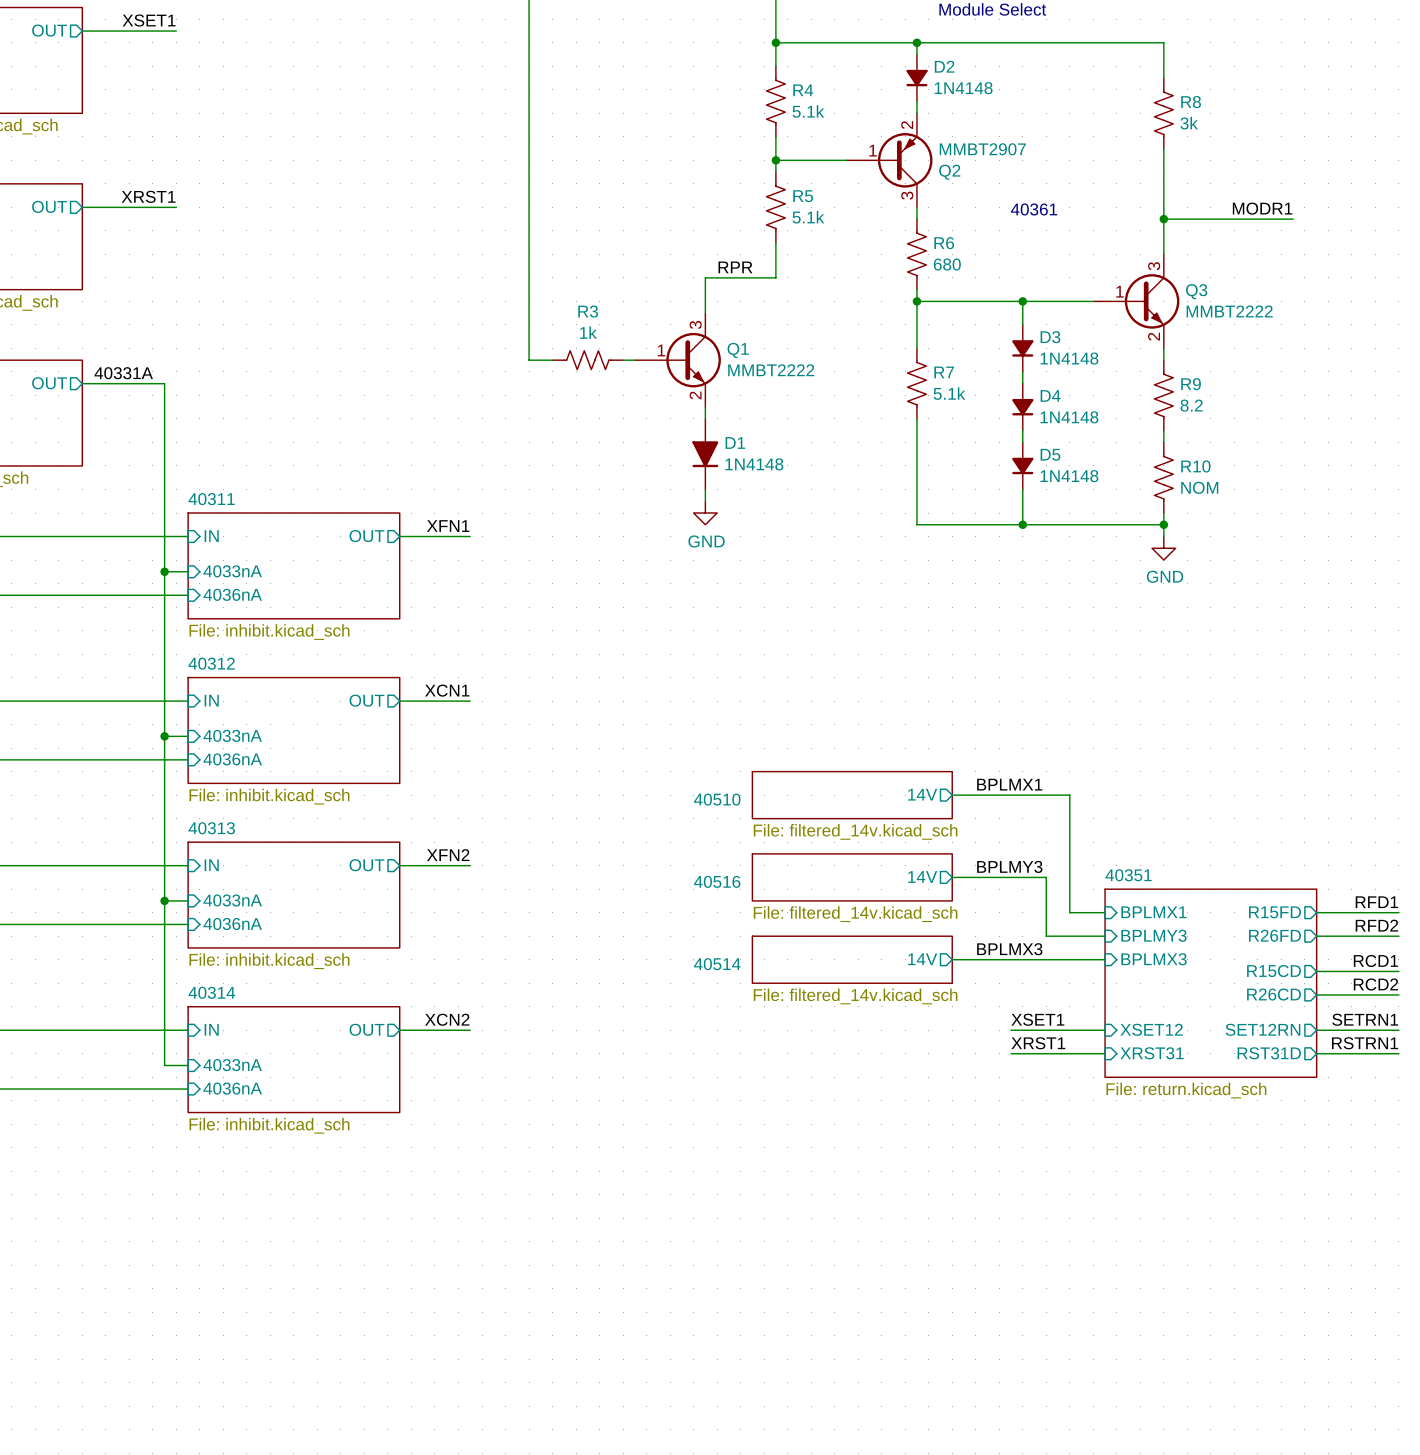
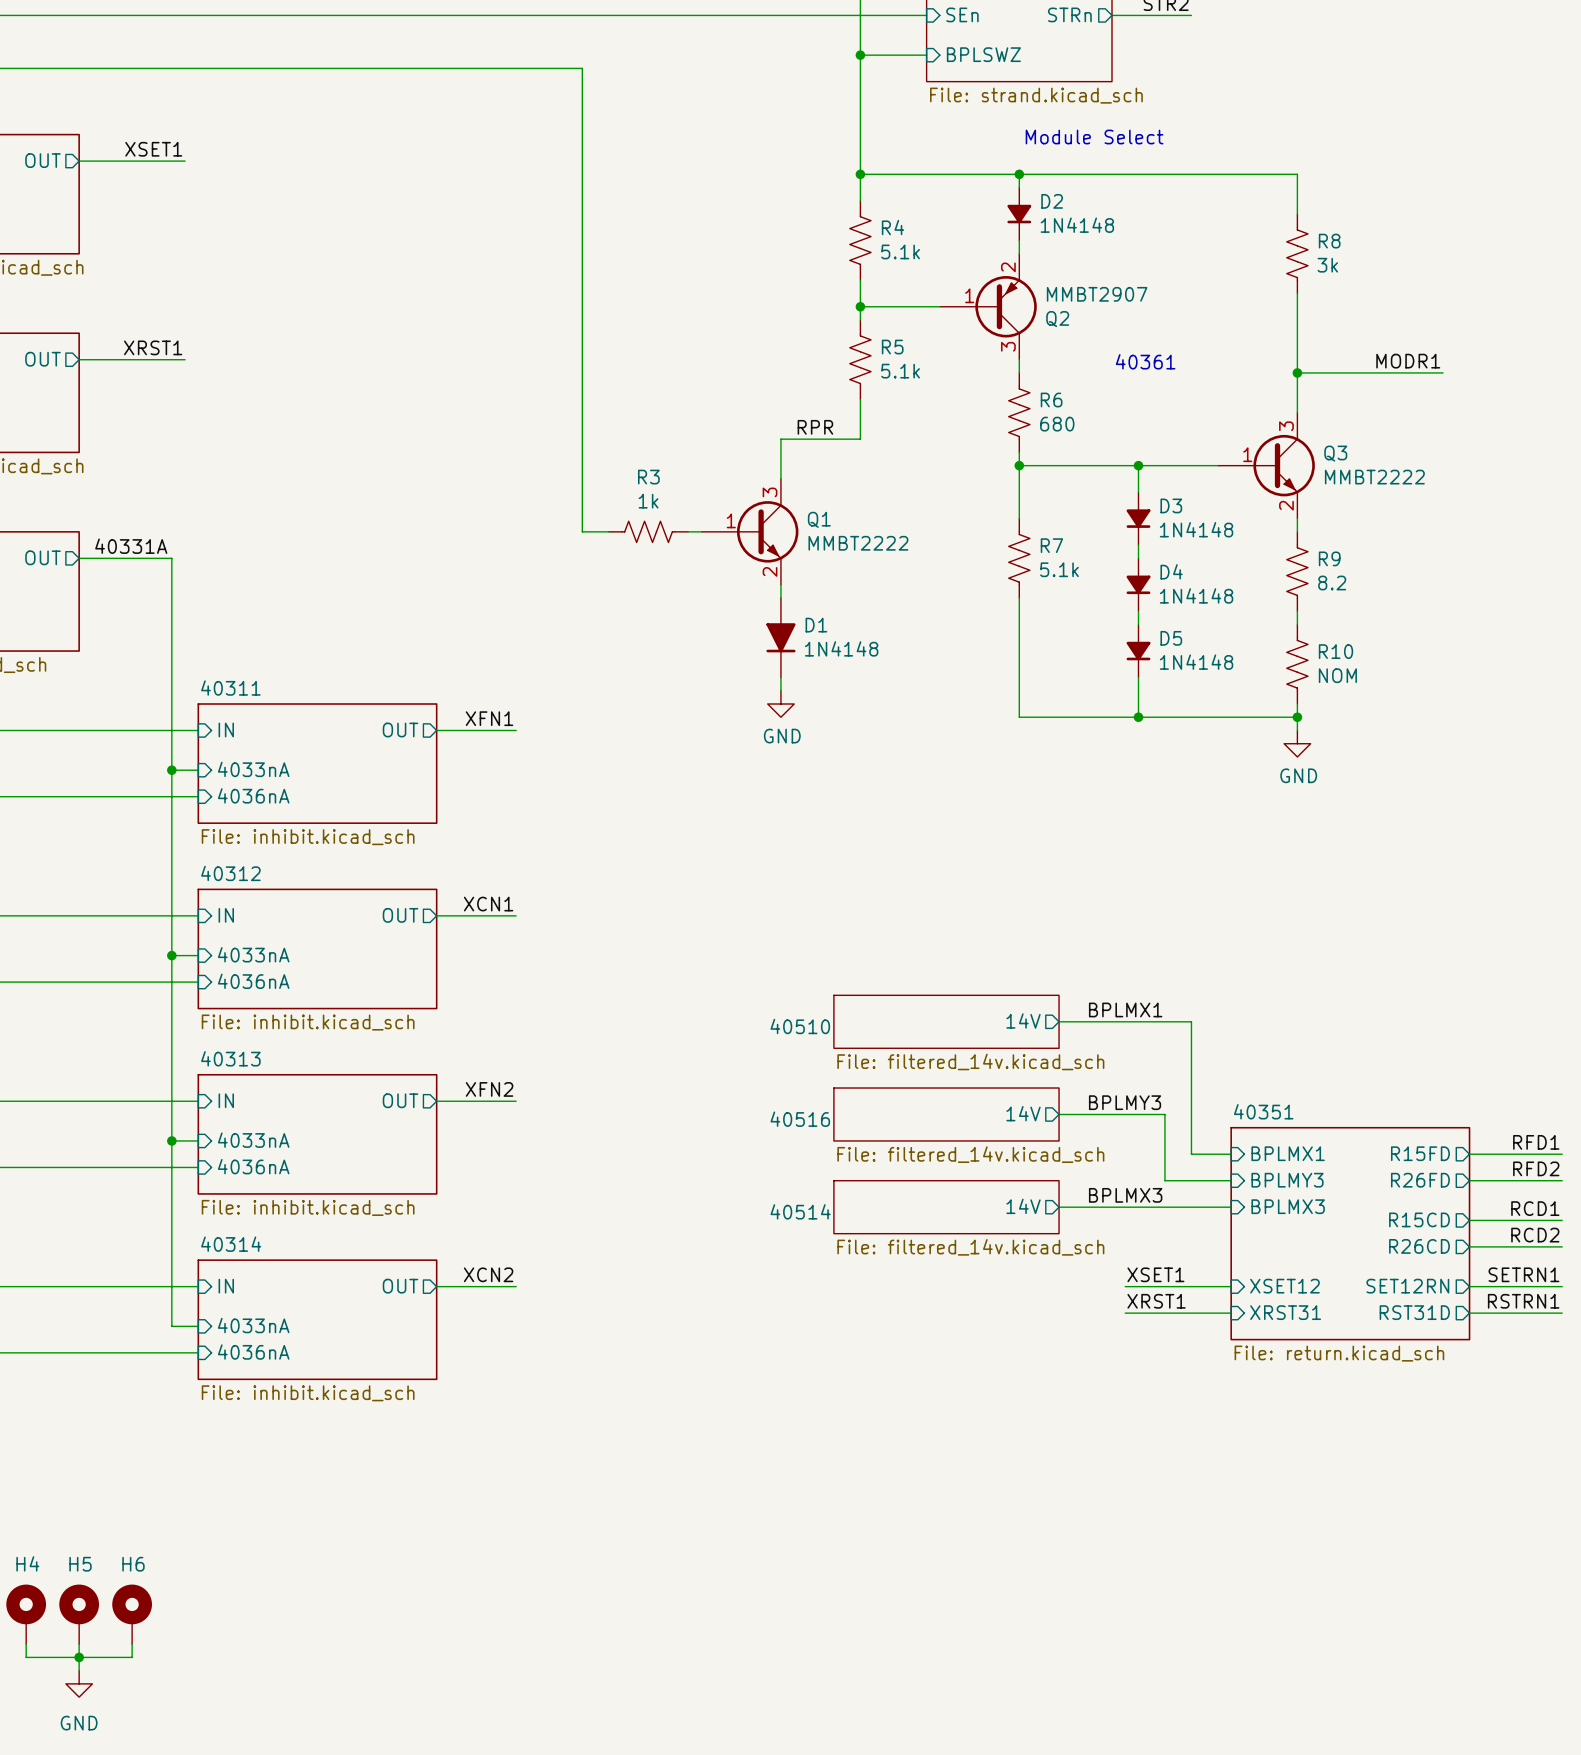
H4: none -> (26, 1614)
H5: none -> (79, 1614)
H6: none -> (132, 1614)
wire: none -> (26, 1644) (26, 1657) (132, 1657) (132, 1644)
wire: none -> (79, 1644) (79, 1670)
junction: none -> (79, 1657)
power symbol: none -> GND (79, 1683)

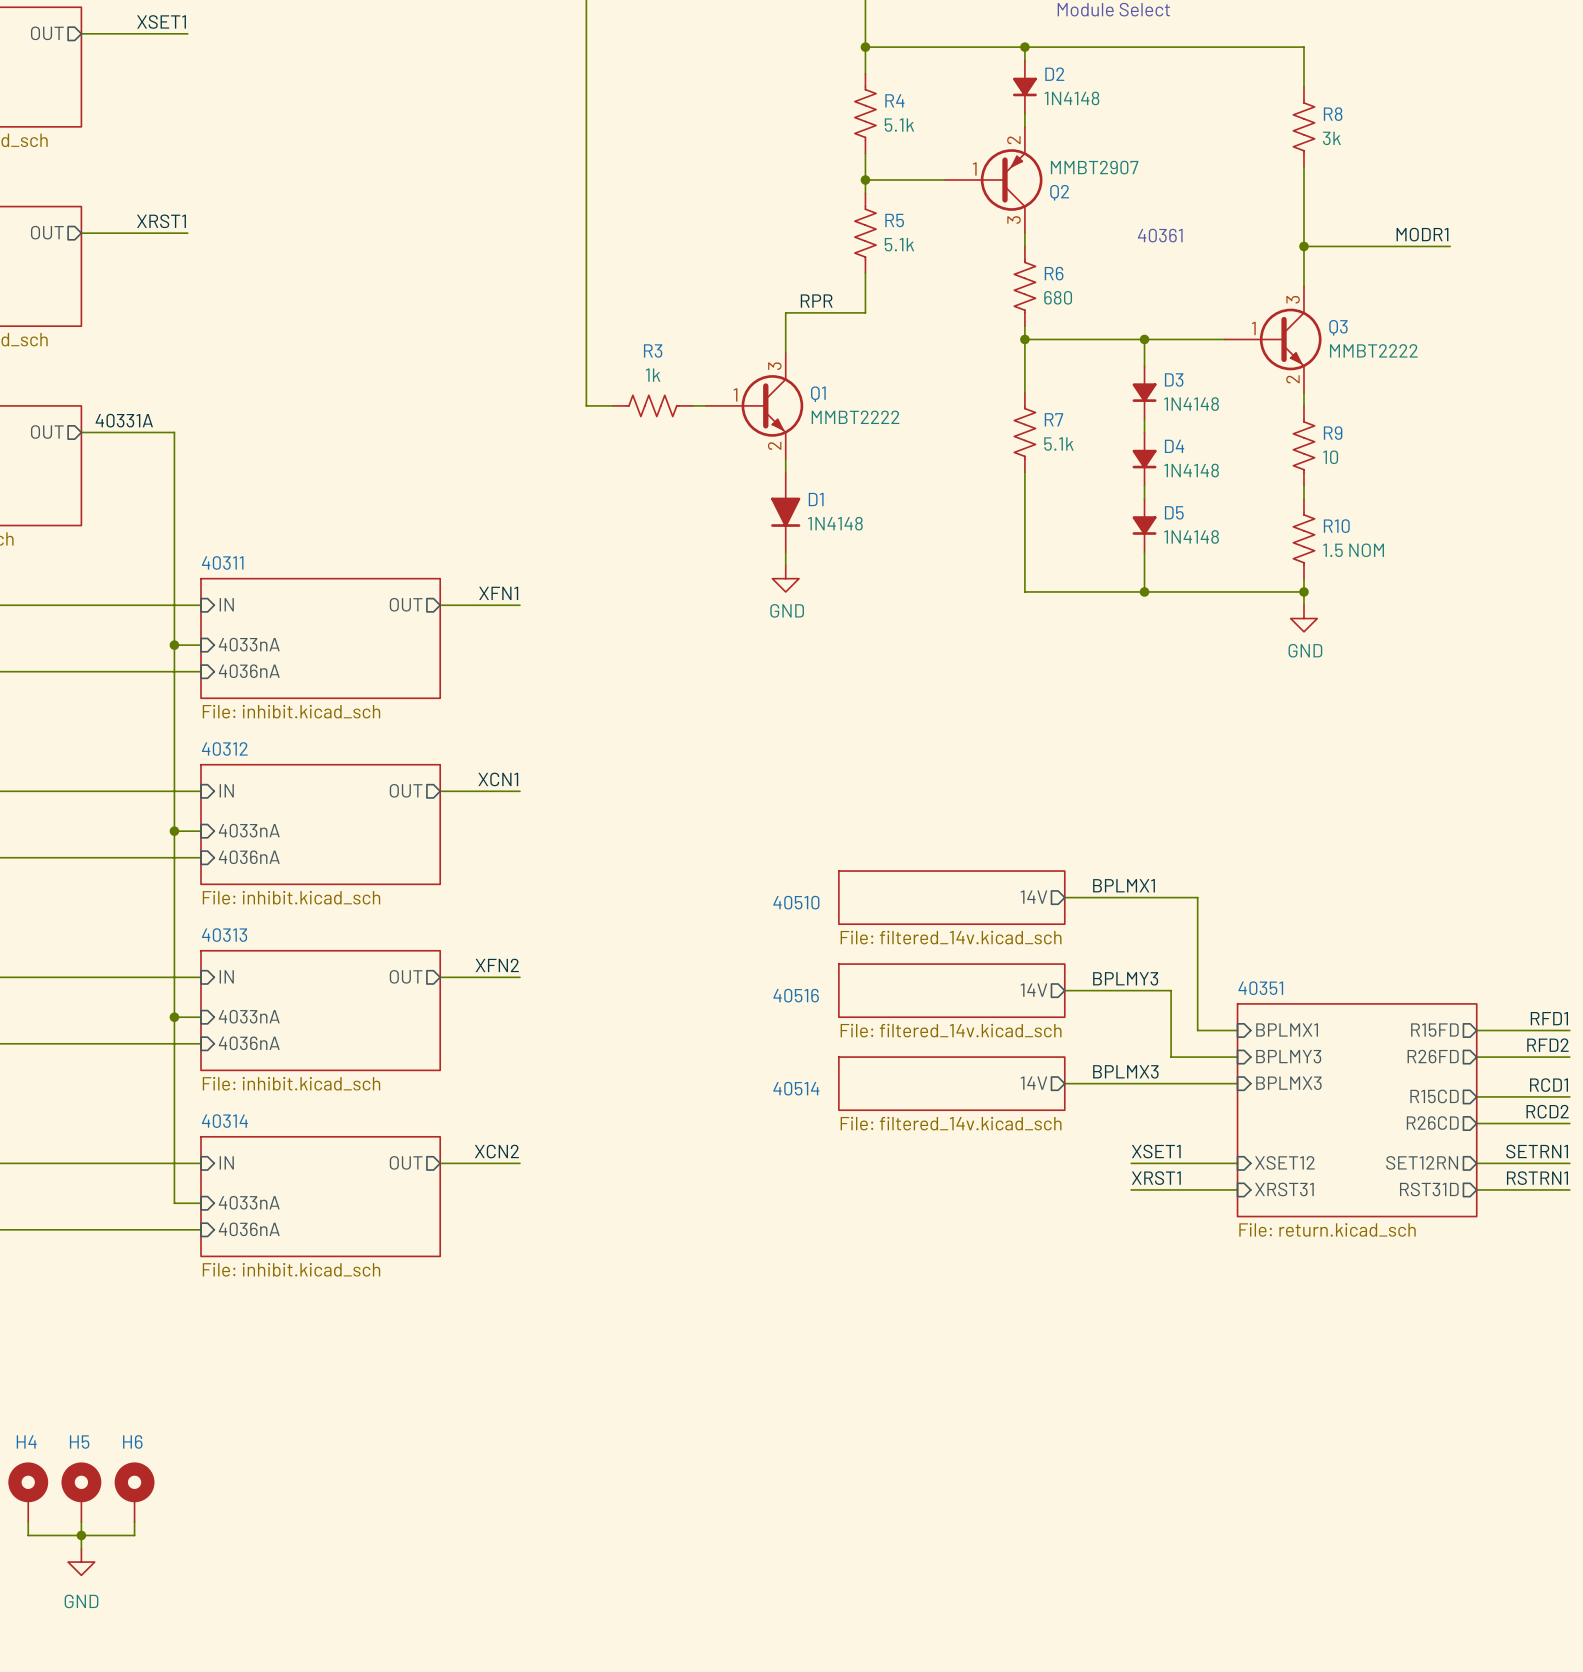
R9 value: 8.2 (1332, 583) -> 10 (1330, 457)
R10 value: NOM (1337, 675) -> 1.5 NOM (1353, 550)

